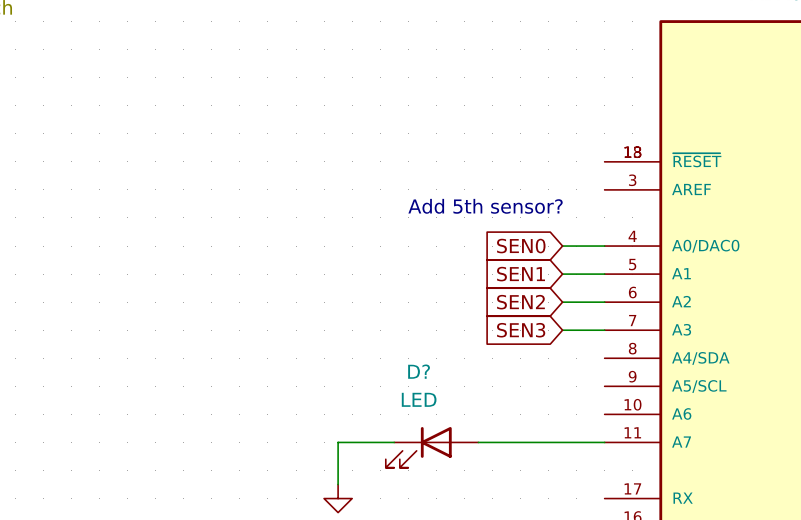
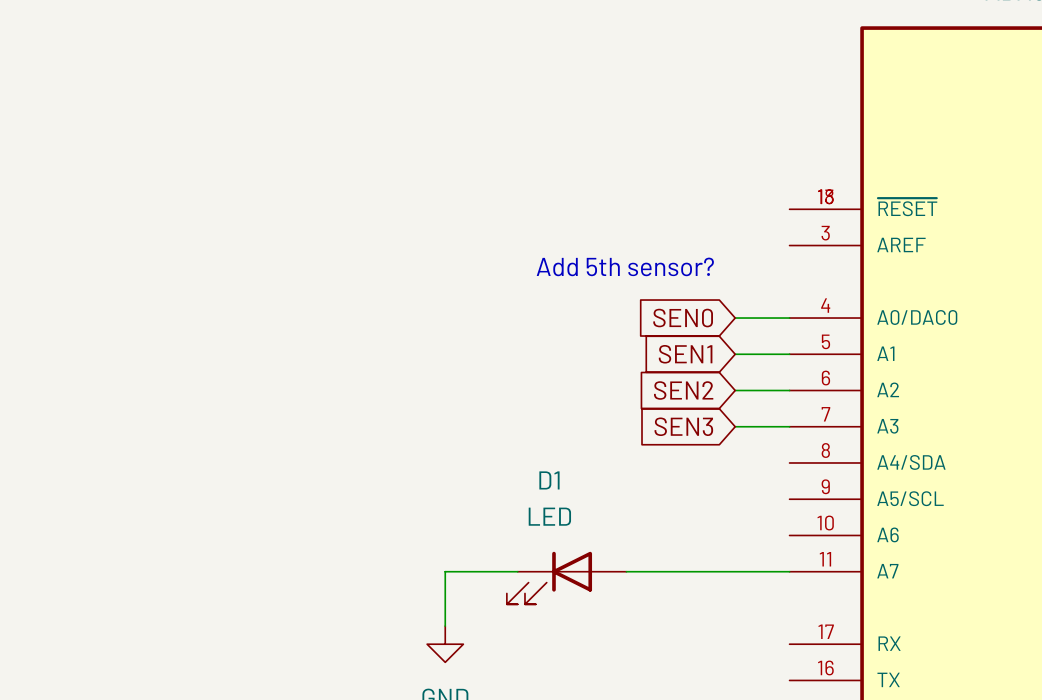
D? name: D? (419, 371) -> D1 (549, 480)

